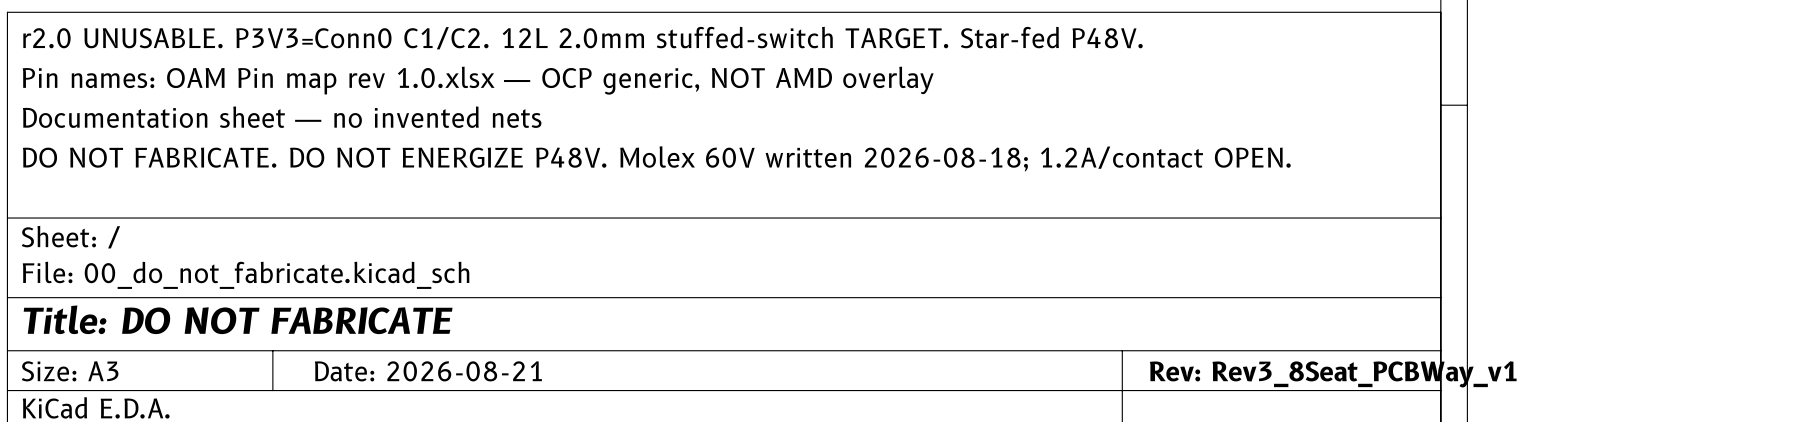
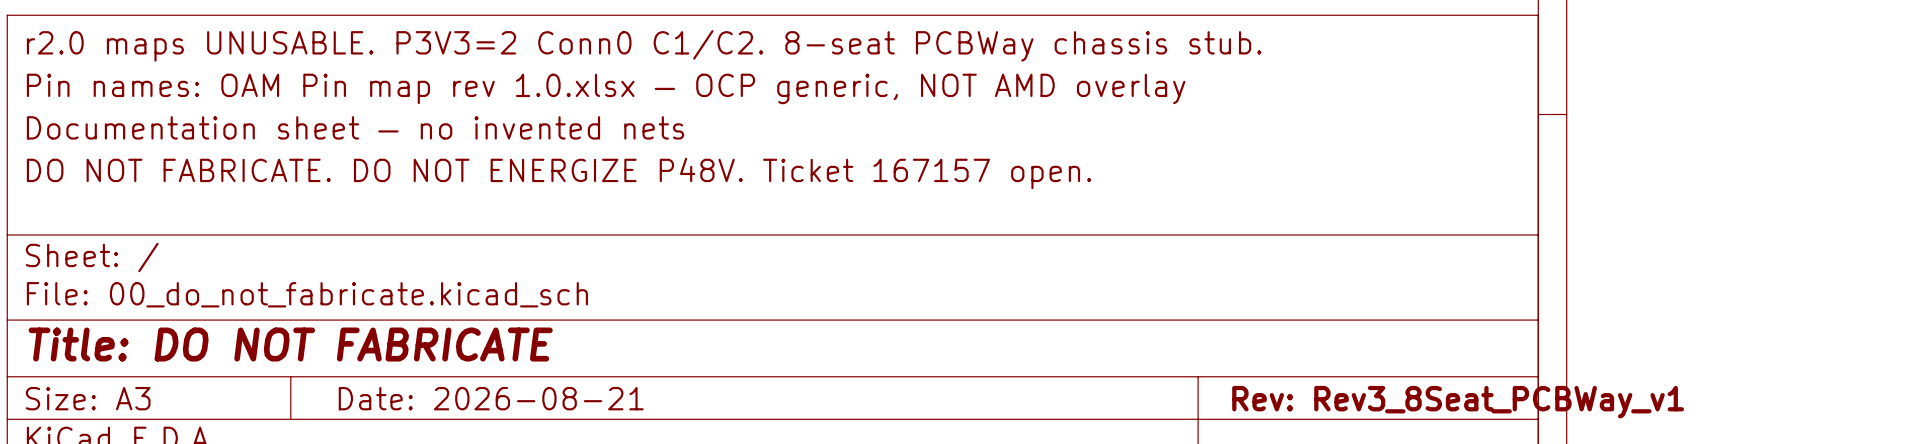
title block: r2.0 UNUSABLE. P3V3=Conn0 C1/C2. 12L 2.0mm stuffed-switch TARGET. Star-fed P48V. (583, 38) -> r2.0 maps UNUSABLE. P3V3=2 Conn0 C1/C2. 8-seat PCBWay chassis stub. (644, 45)
title block: DO NOT FABRICATE. DO NOT ENERGIZE P48V. Molex 60V written 2026-08-18; 1.2A/contact OPEN. (656, 158) -> DO NOT FABRICATE. DO NOT ENERGIZE P48V. Ticket 167157 open. (559, 173)

